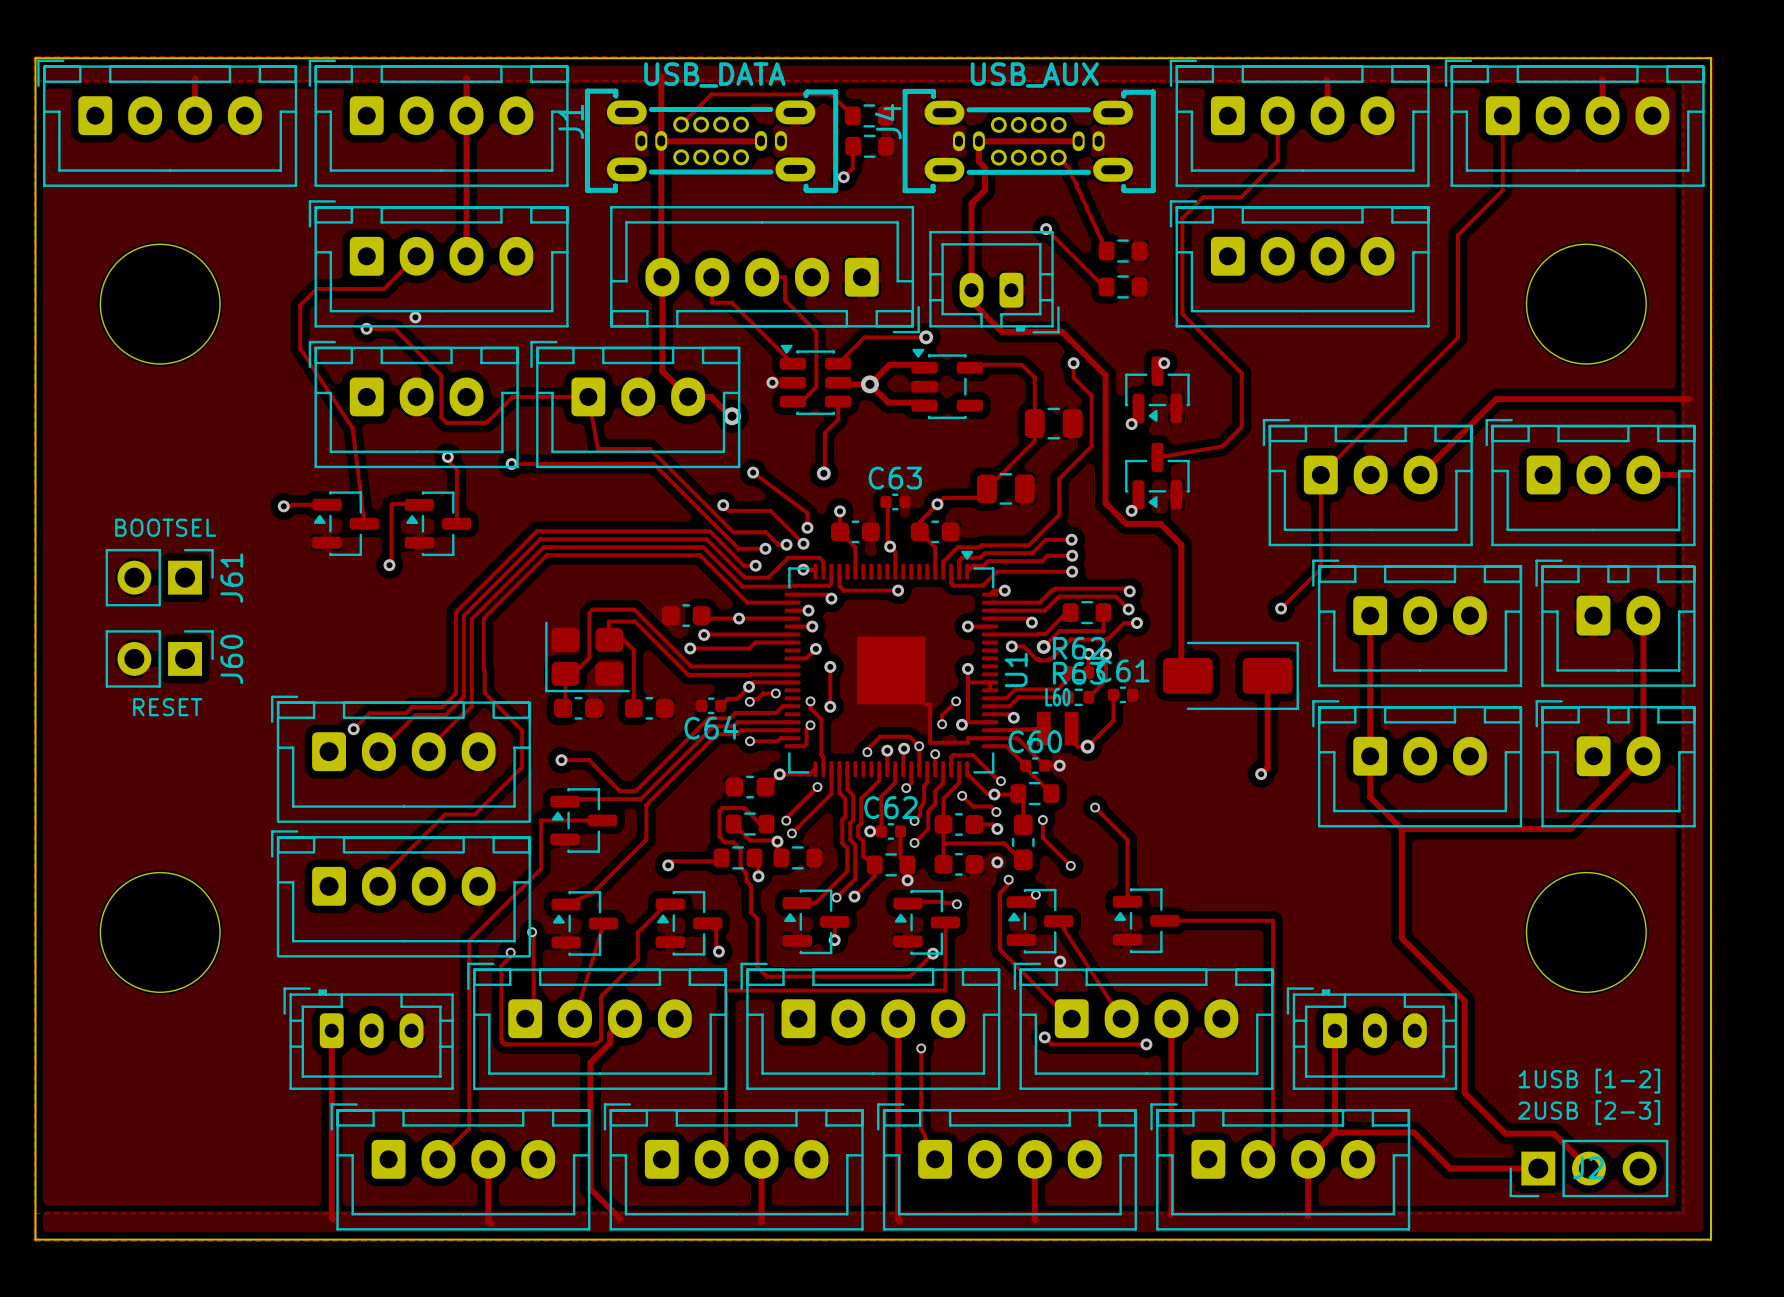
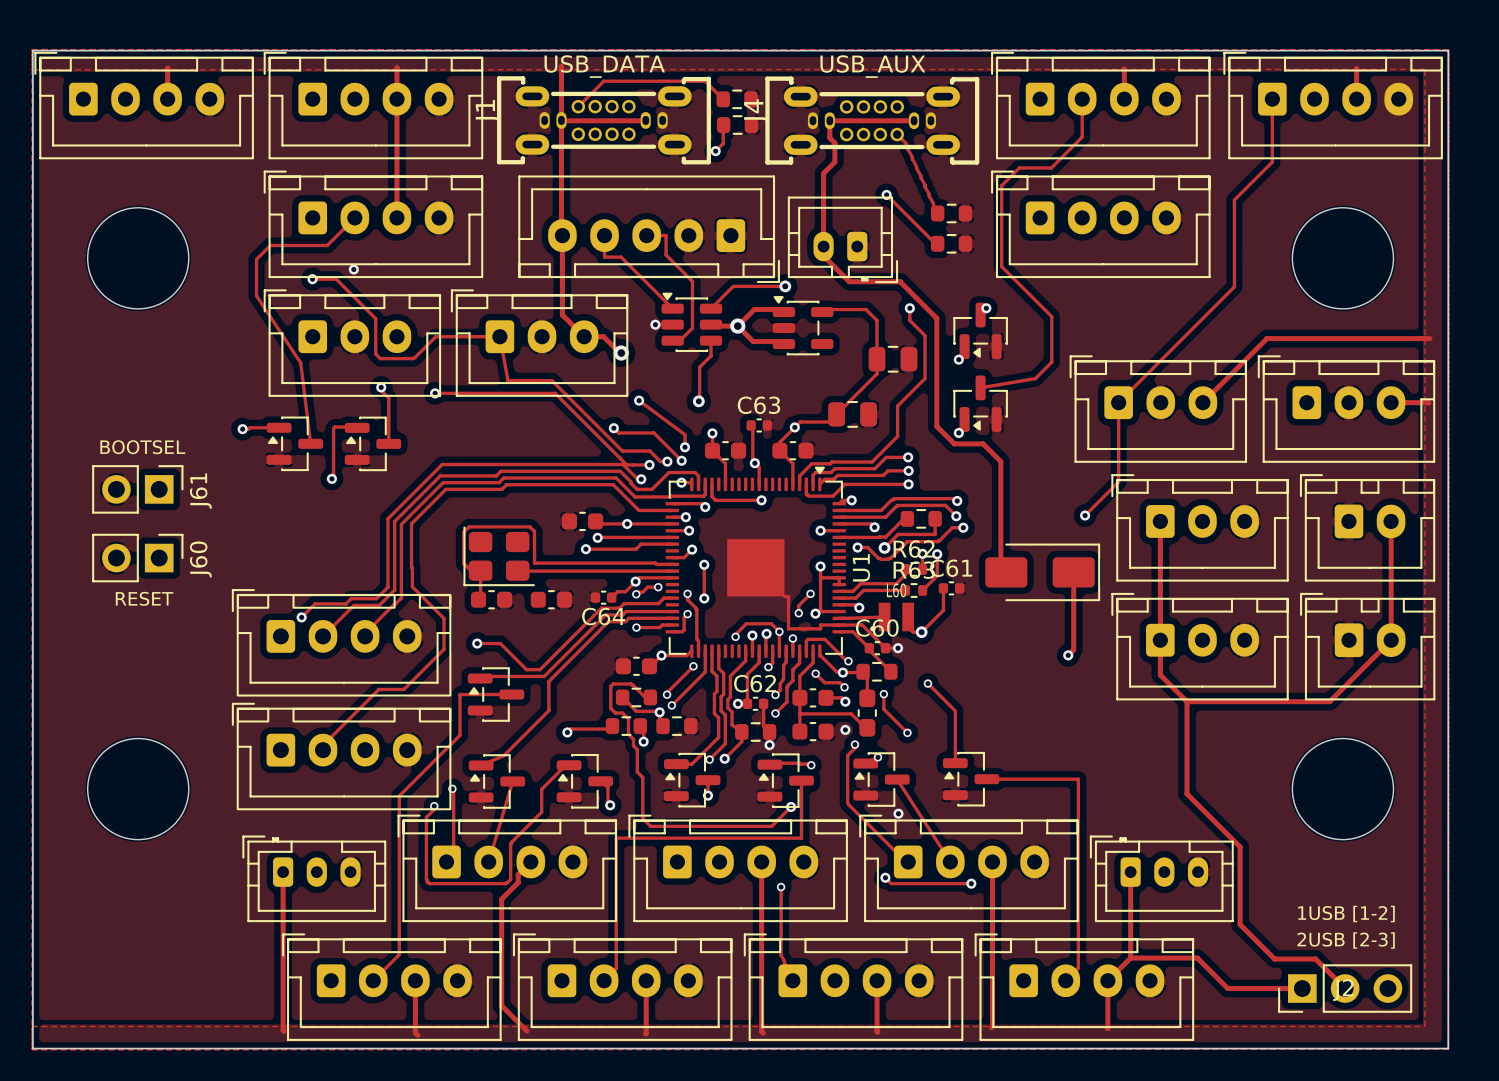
track: (520, 548) (536, 531) (709, 531) (744, 565) (751, 565) -> (442, 464) (623, 464) (637, 479)
track: (517, 561) (540, 539) (706, 539) (744, 577) (750, 577) -> (440, 475) (496, 475) (500, 471) (620, 471) (637, 489)
track: (521, 569) (543, 547) (703, 547) (742, 586) (748, 586) -> (443, 482) (499, 482) (503, 478) (616, 478) (635, 496)
track: (524, 577) (546, 555) (699, 555) (747, 602) (753, 602) -> (445, 489) (501, 489) (506, 484) (613, 484) (639, 510)
track: (773, 666) (691, 666) (634, 609) (592, 609) (589, 613) (589, 657) (573, 673) (565, 673) -> (656, 564) (534, 563) (534, 531) (529, 526) (469, 526) (463, 532) (463, 563) (470, 570)
track: (750, 674) (688, 674) (635, 621) (608, 621) (608, 639) (623, 639) (633, 649) (633, 708) -> (636, 571) (529, 571)

